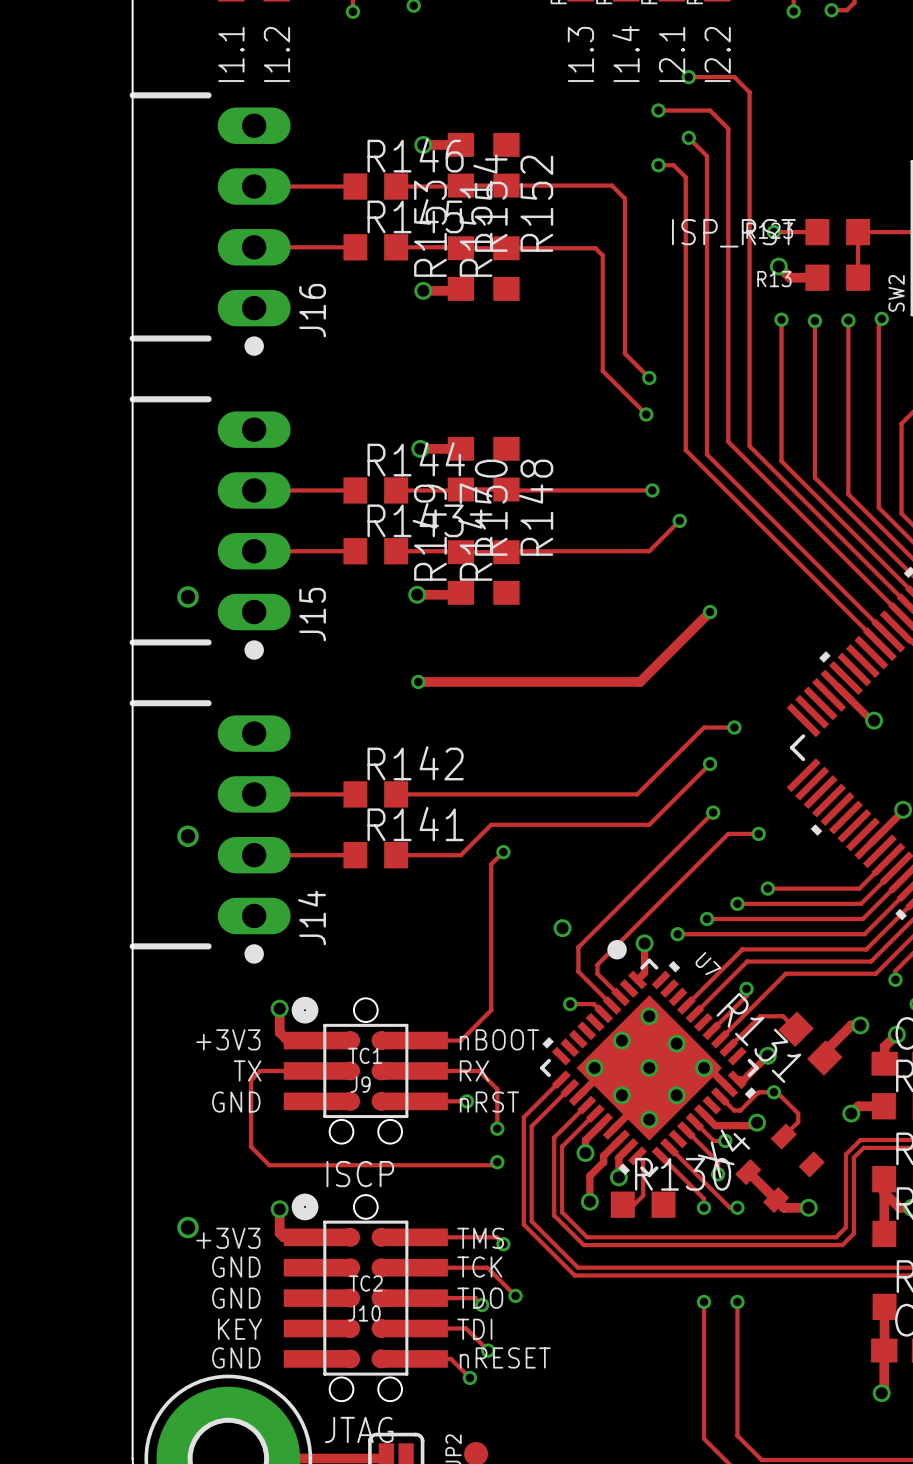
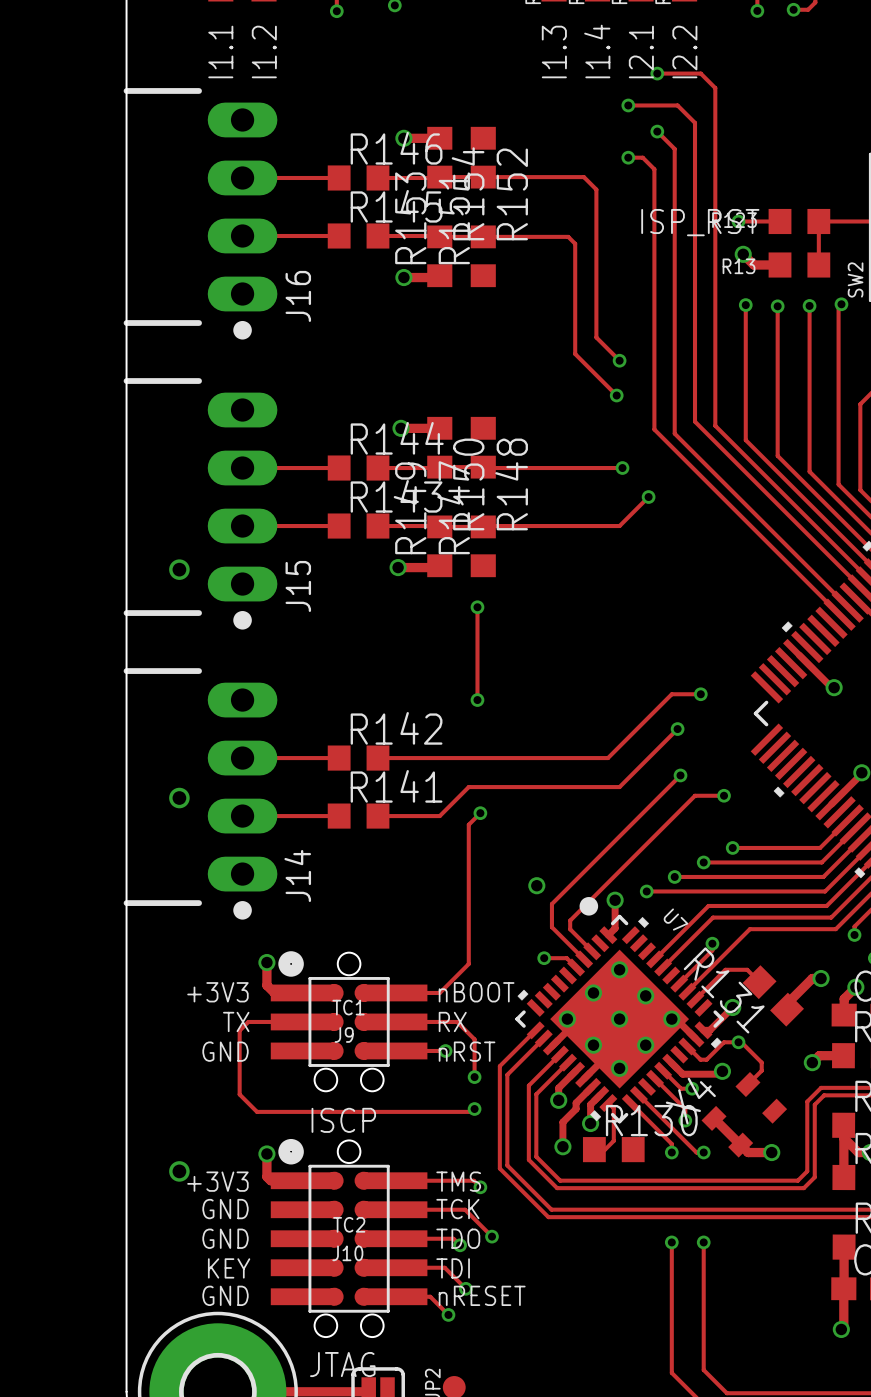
track: (710, 612) (640, 681) (418, 681) -> none
via: (710, 612) -> none
track: none -> (477, 607) (477, 700)
via: none -> (477, 607)
via: (418, 681) -> none
via: none -> (477, 700)

